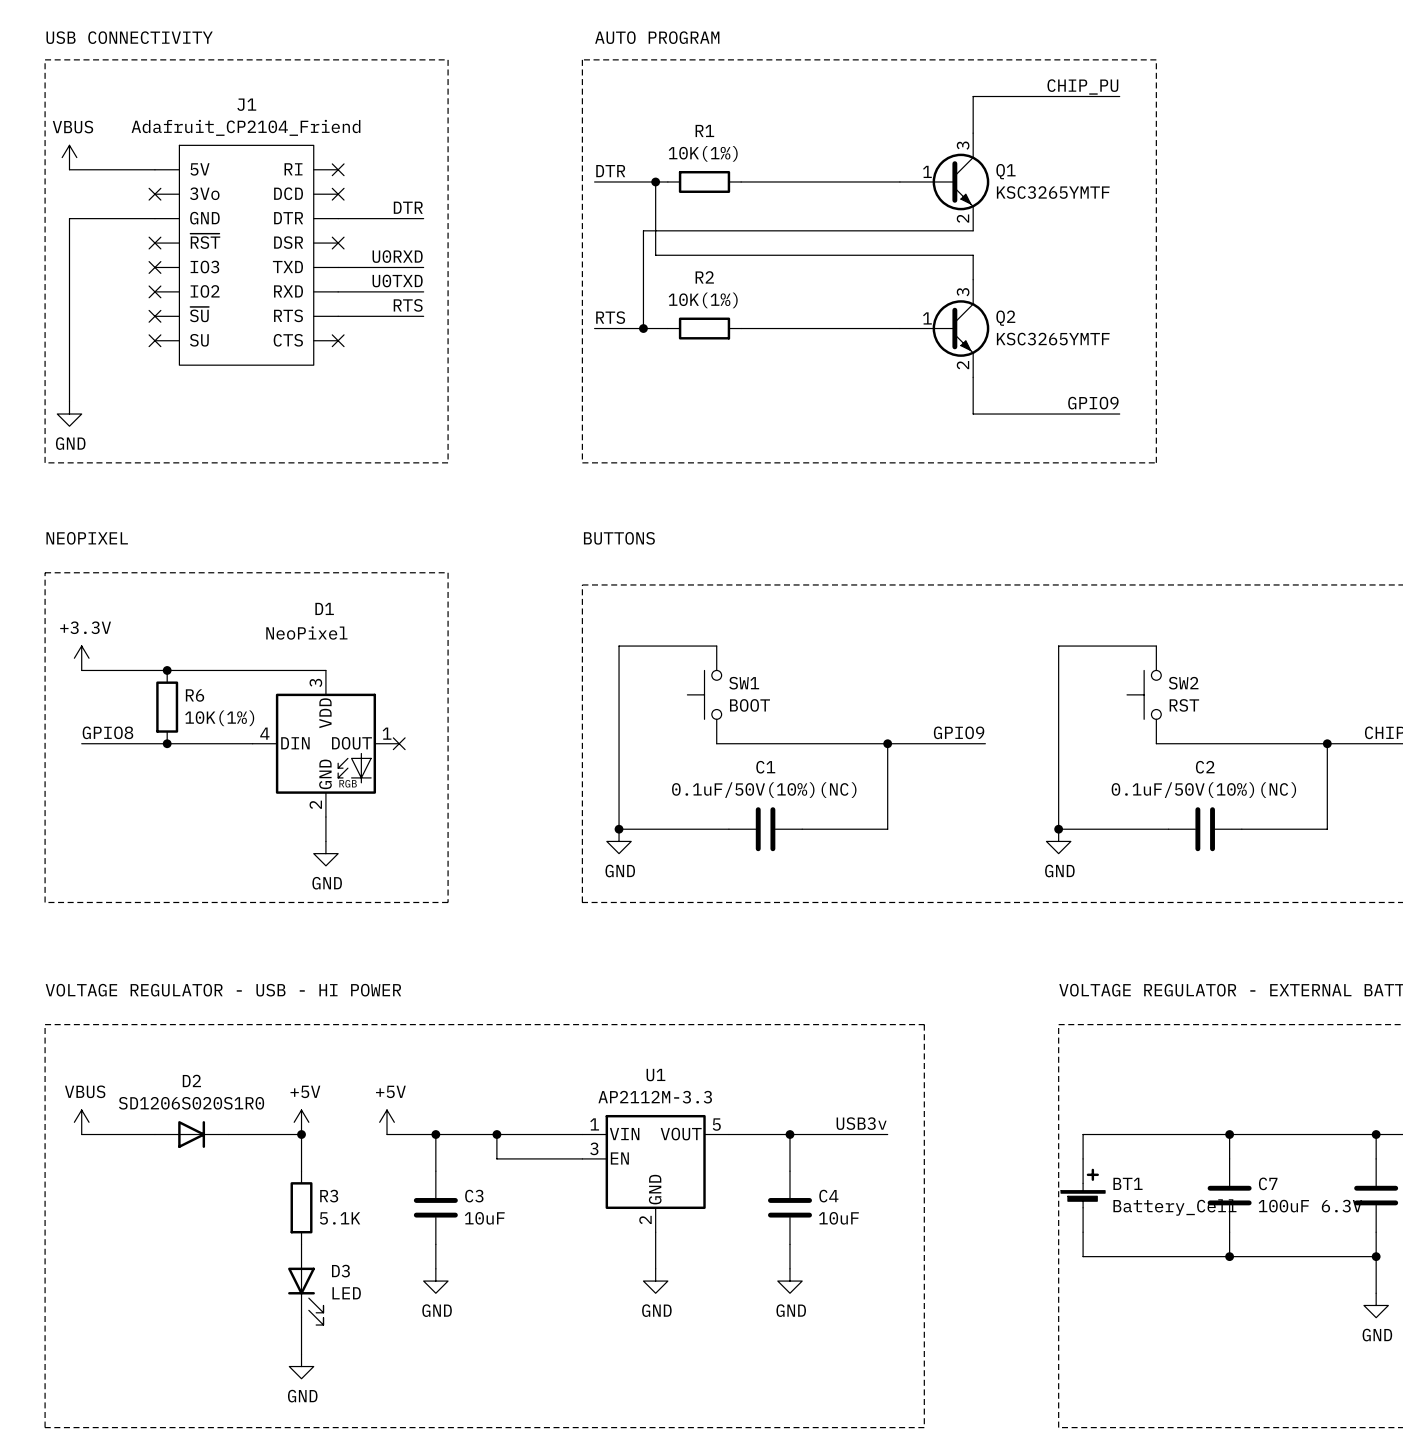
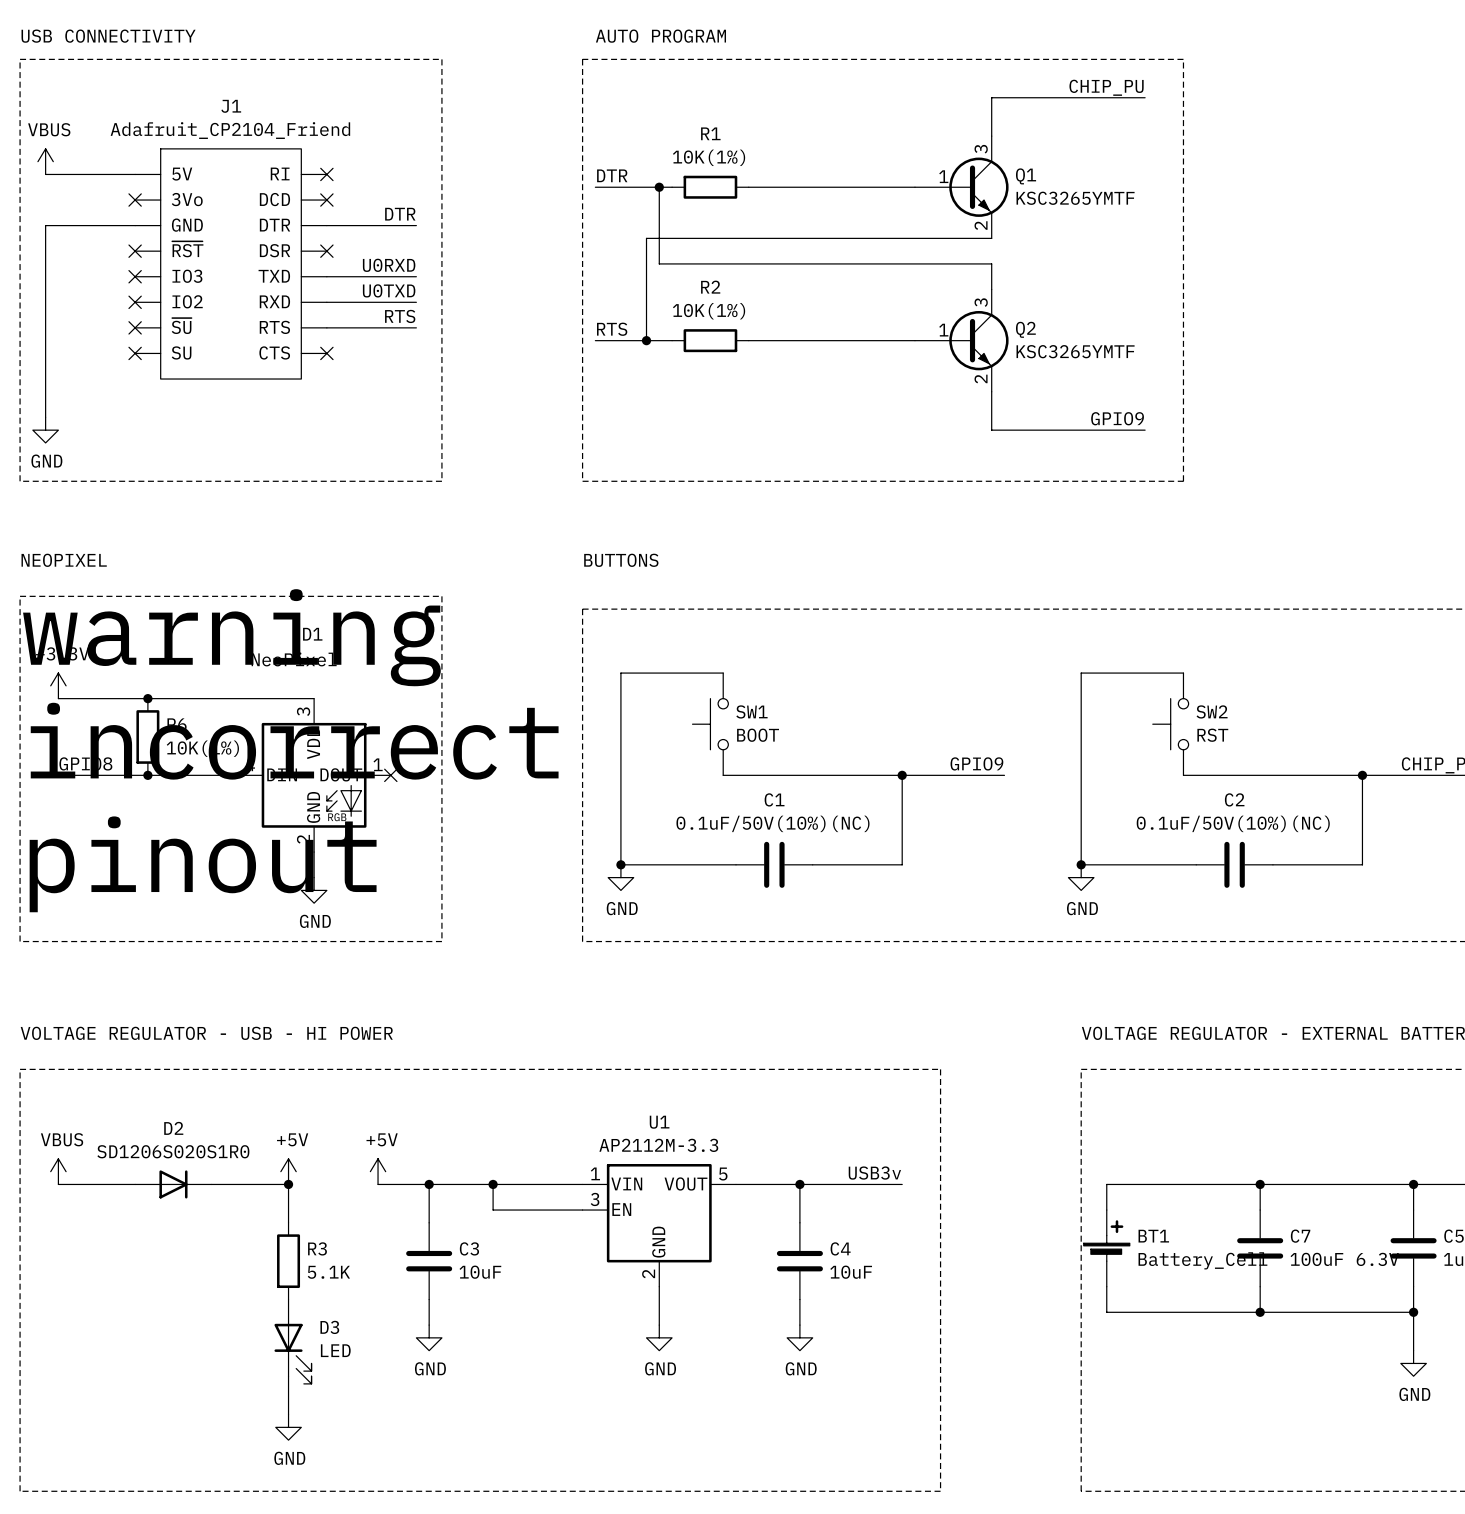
text: none -> warning (231, 637)
text: none -> incorrect (294, 741)
text: none -> pinout (203, 864)

